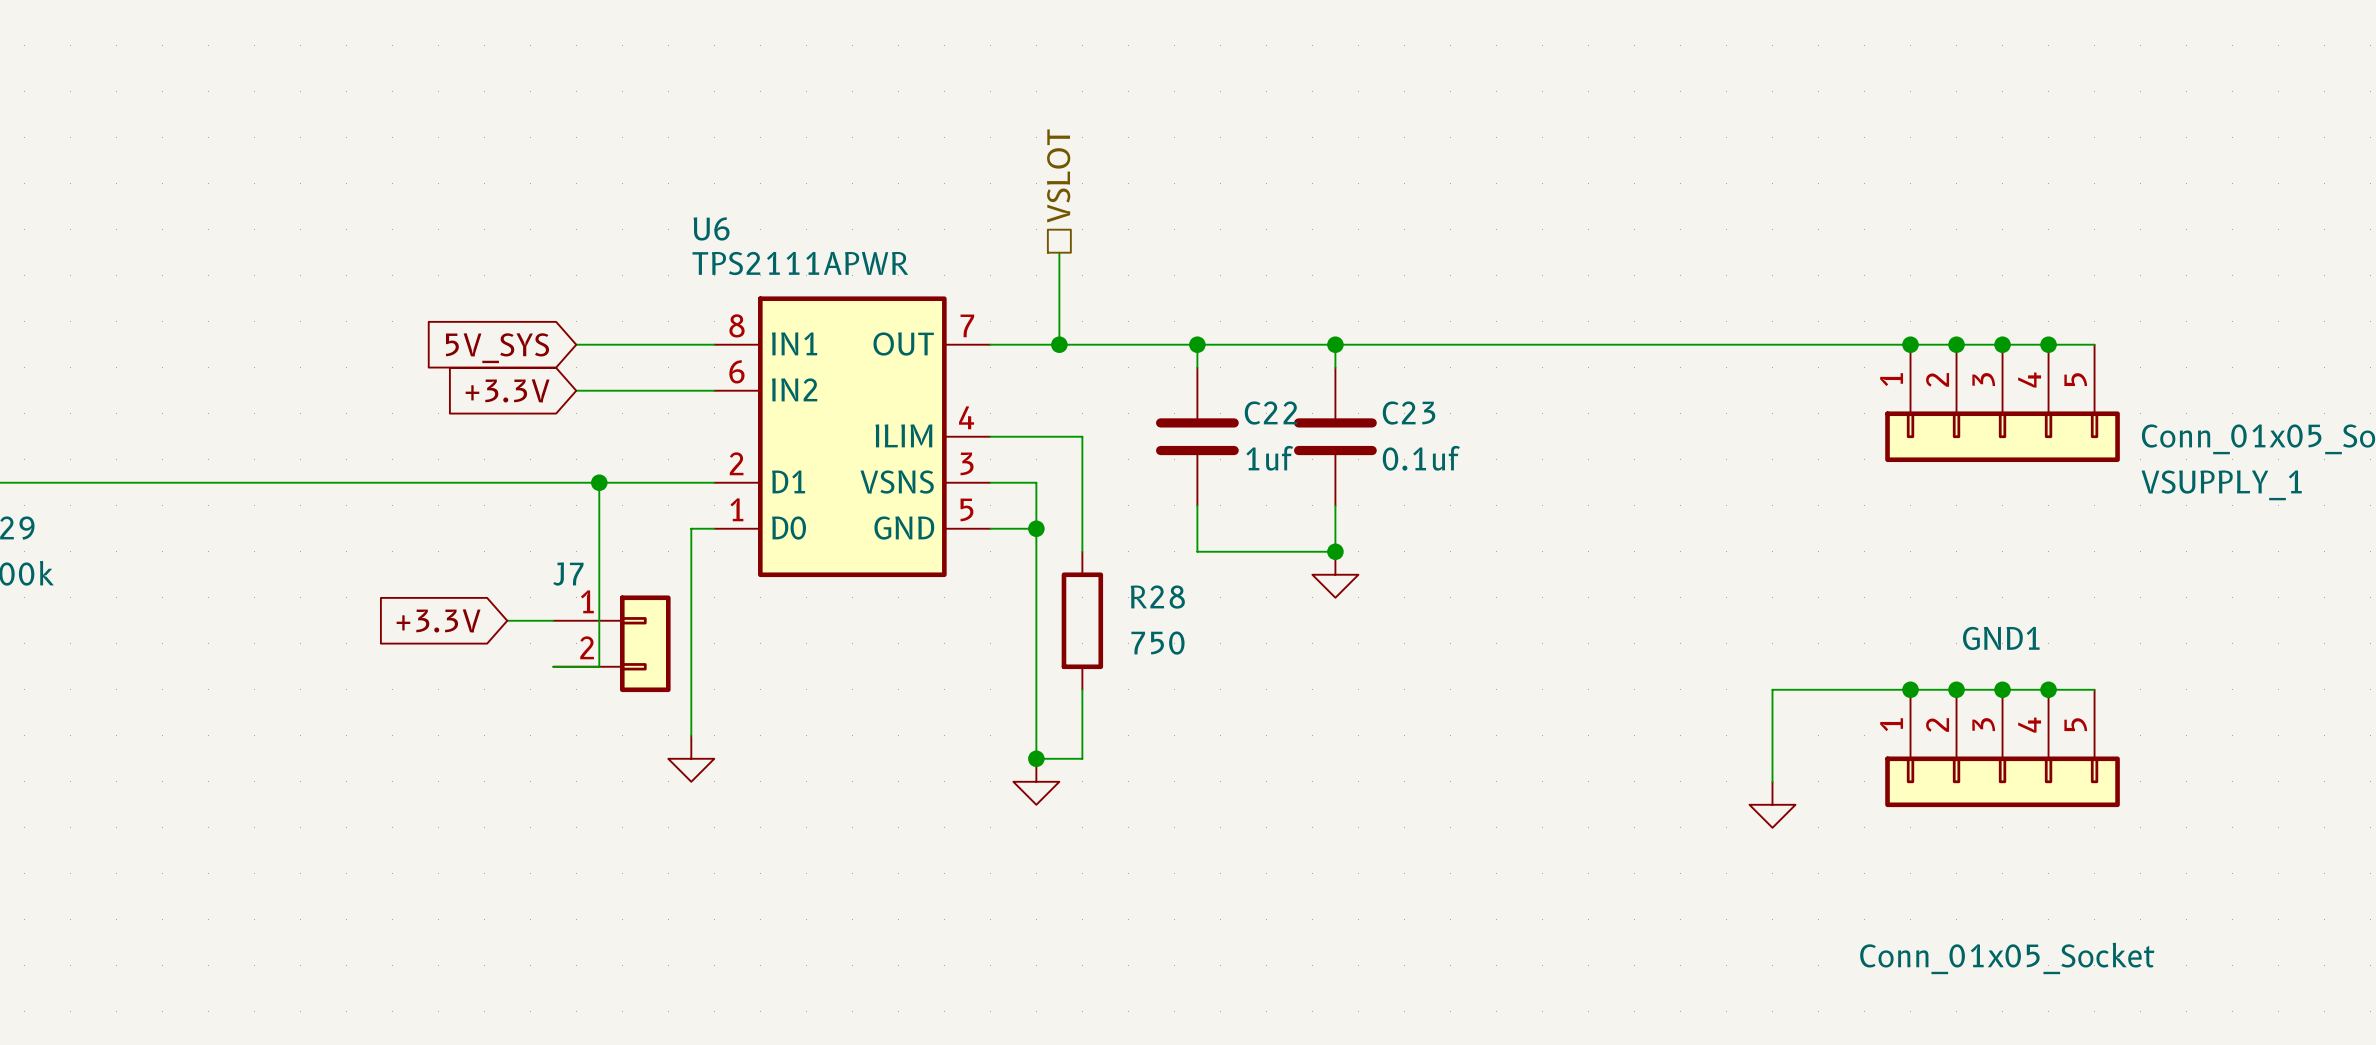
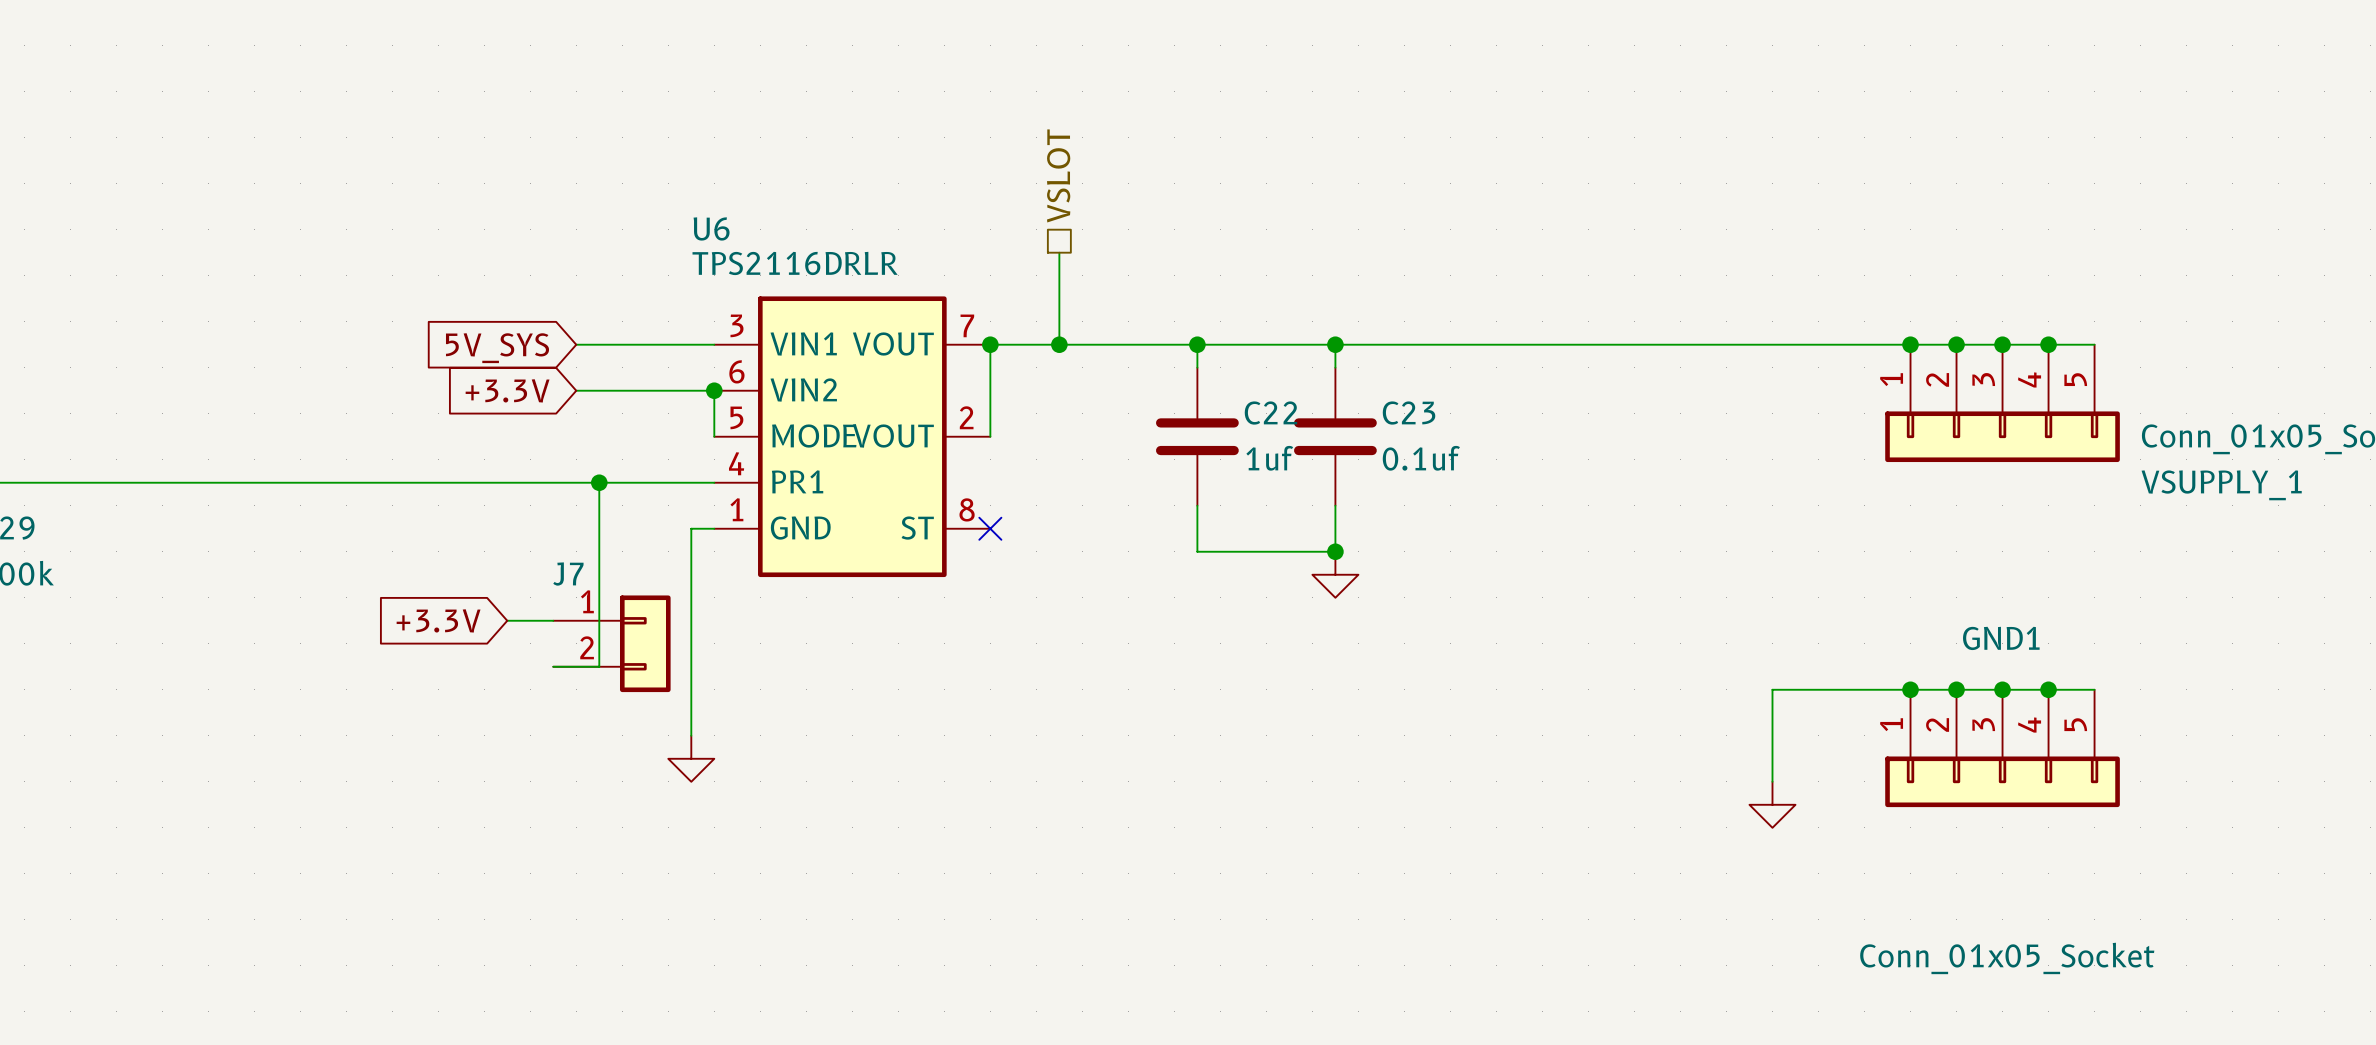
U6 value: TPS2111APWR (800, 263) -> TPS2116DRLR (795, 263)
U6 symbol: [714, 296, 991, 578] -> [714, 296, 991, 578]
junction: none -> (990, 344)
wire: none -> (714, 390) (714, 436)
junction: none -> (714, 390)
wire: (990, 436) (1082, 436) (1082, 551) -> (990, 436) (990, 344)
wire: (990, 482) (1036, 482) (1036, 758) (1082, 758) (1082, 689) -> none
wire: (990, 528) (1036, 528) -> none
no-connect mark: none -> (990, 528)
junction: (1036, 528) -> none
R28: 750 (1082, 620) -> none
junction: (1036, 758) -> none
power symbol: (1036, 781) -> none

